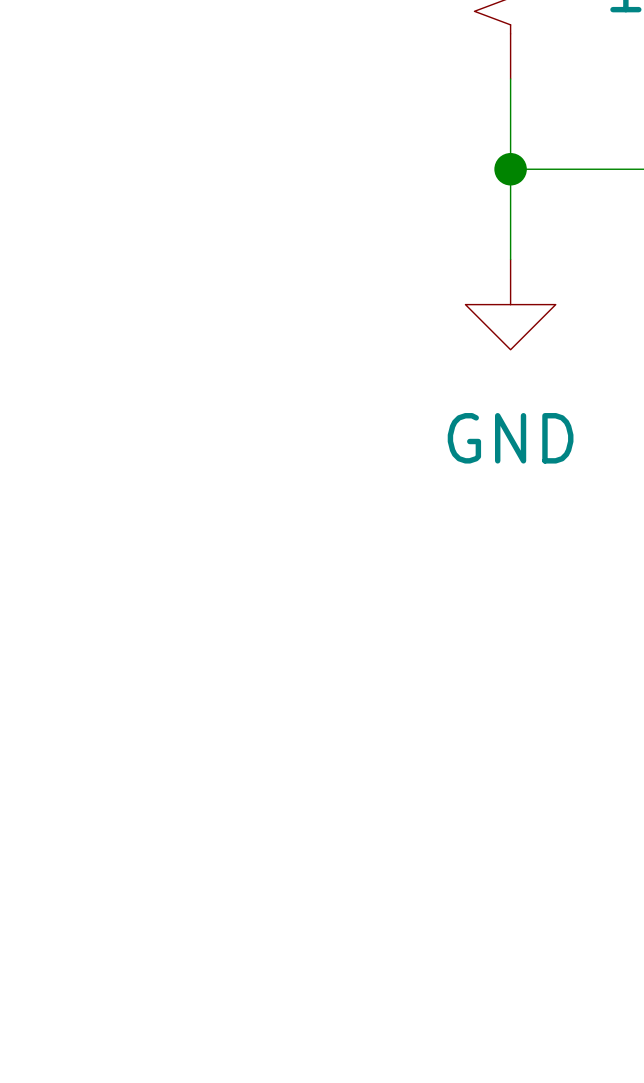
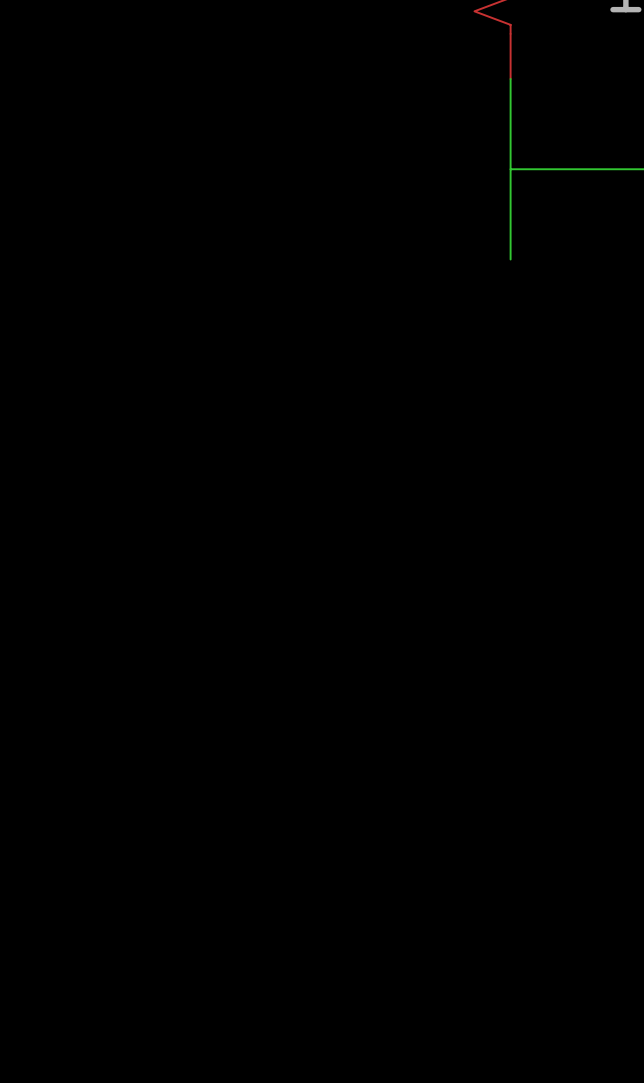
junction: (510, 169) -> none
power symbol: GND (510, 304) -> none

